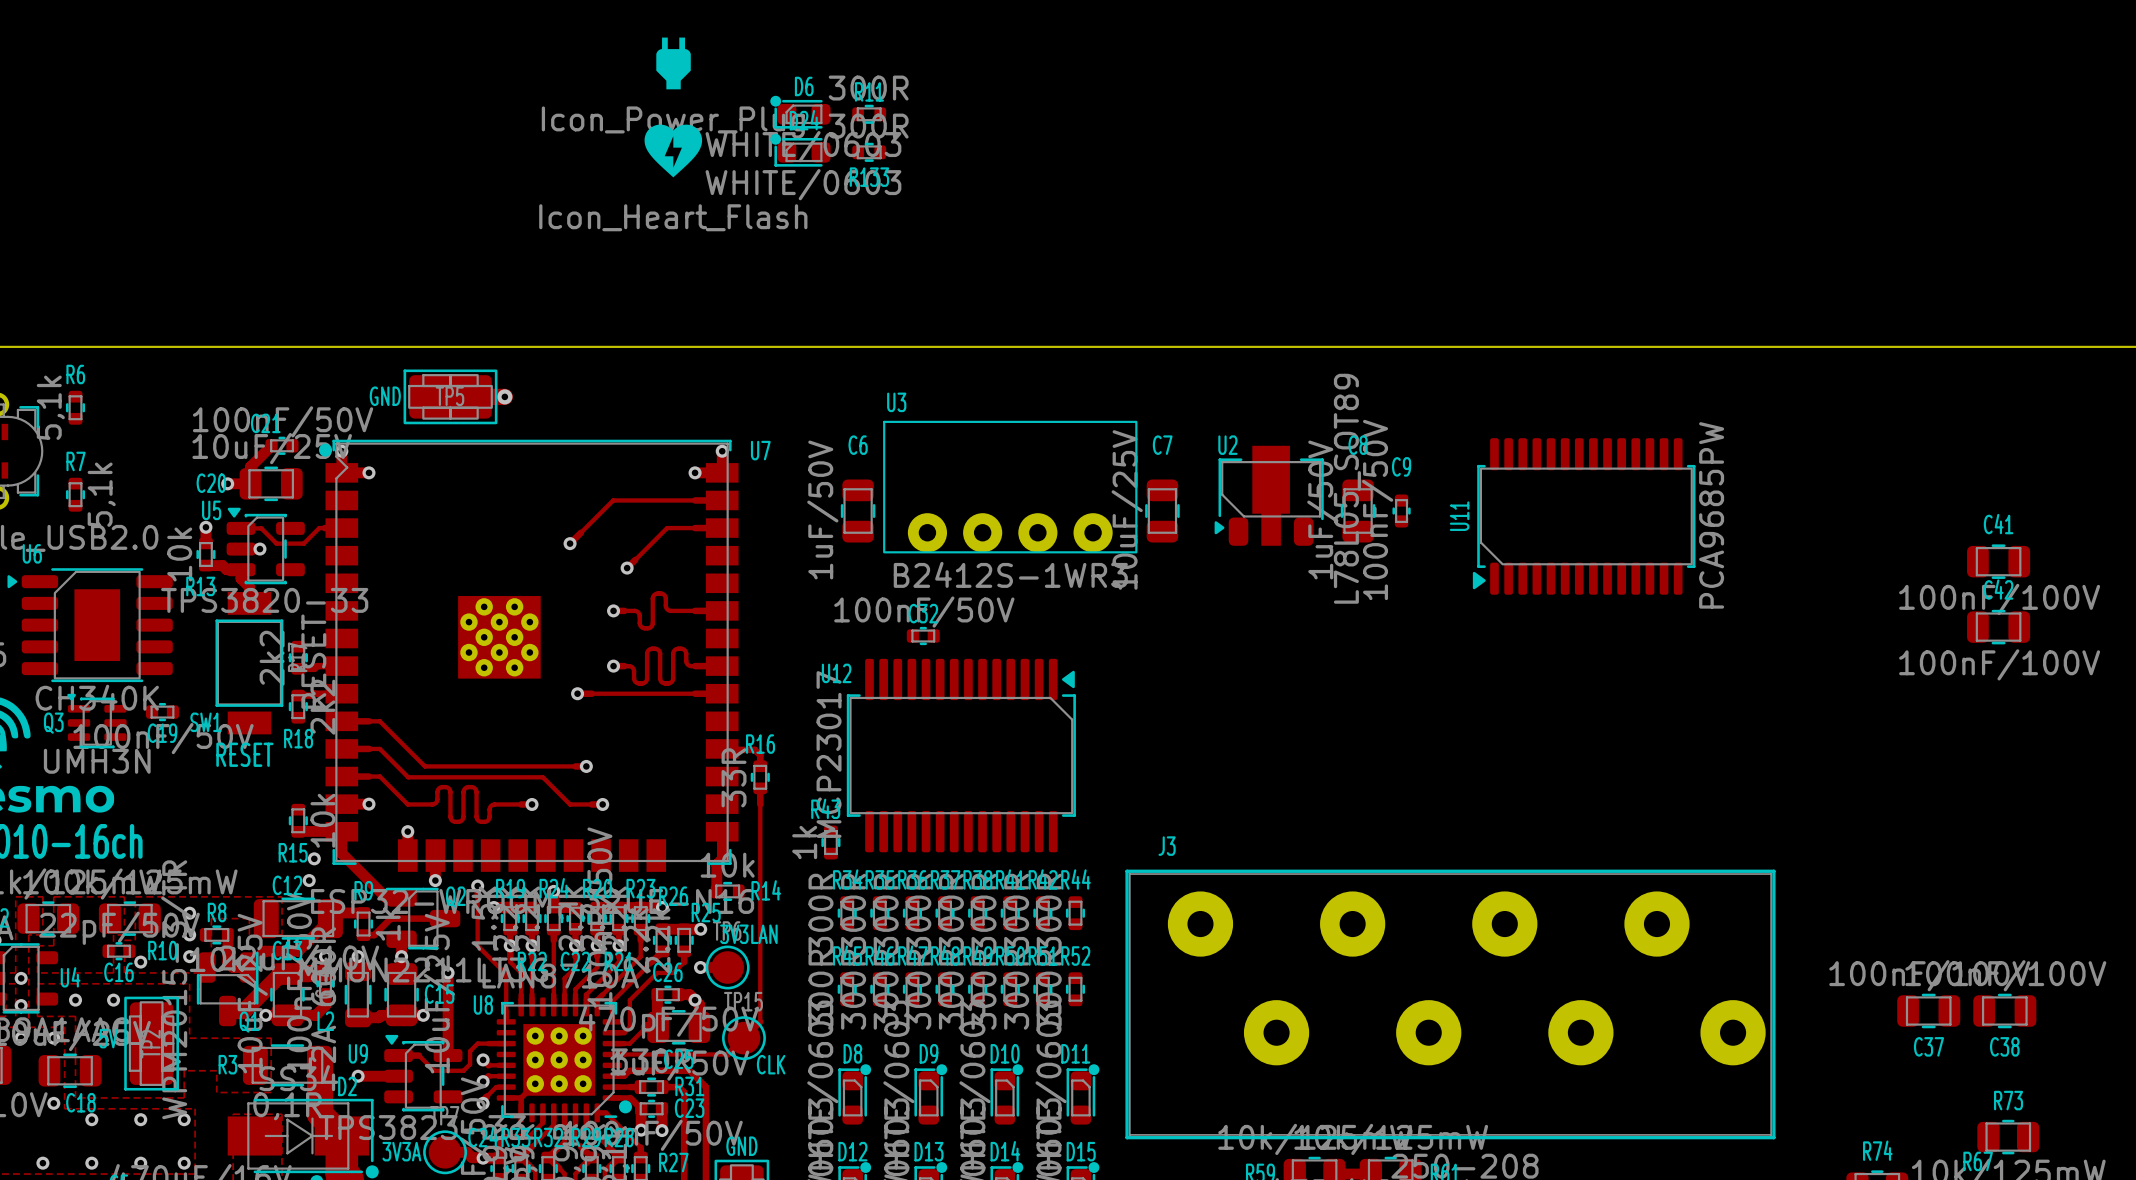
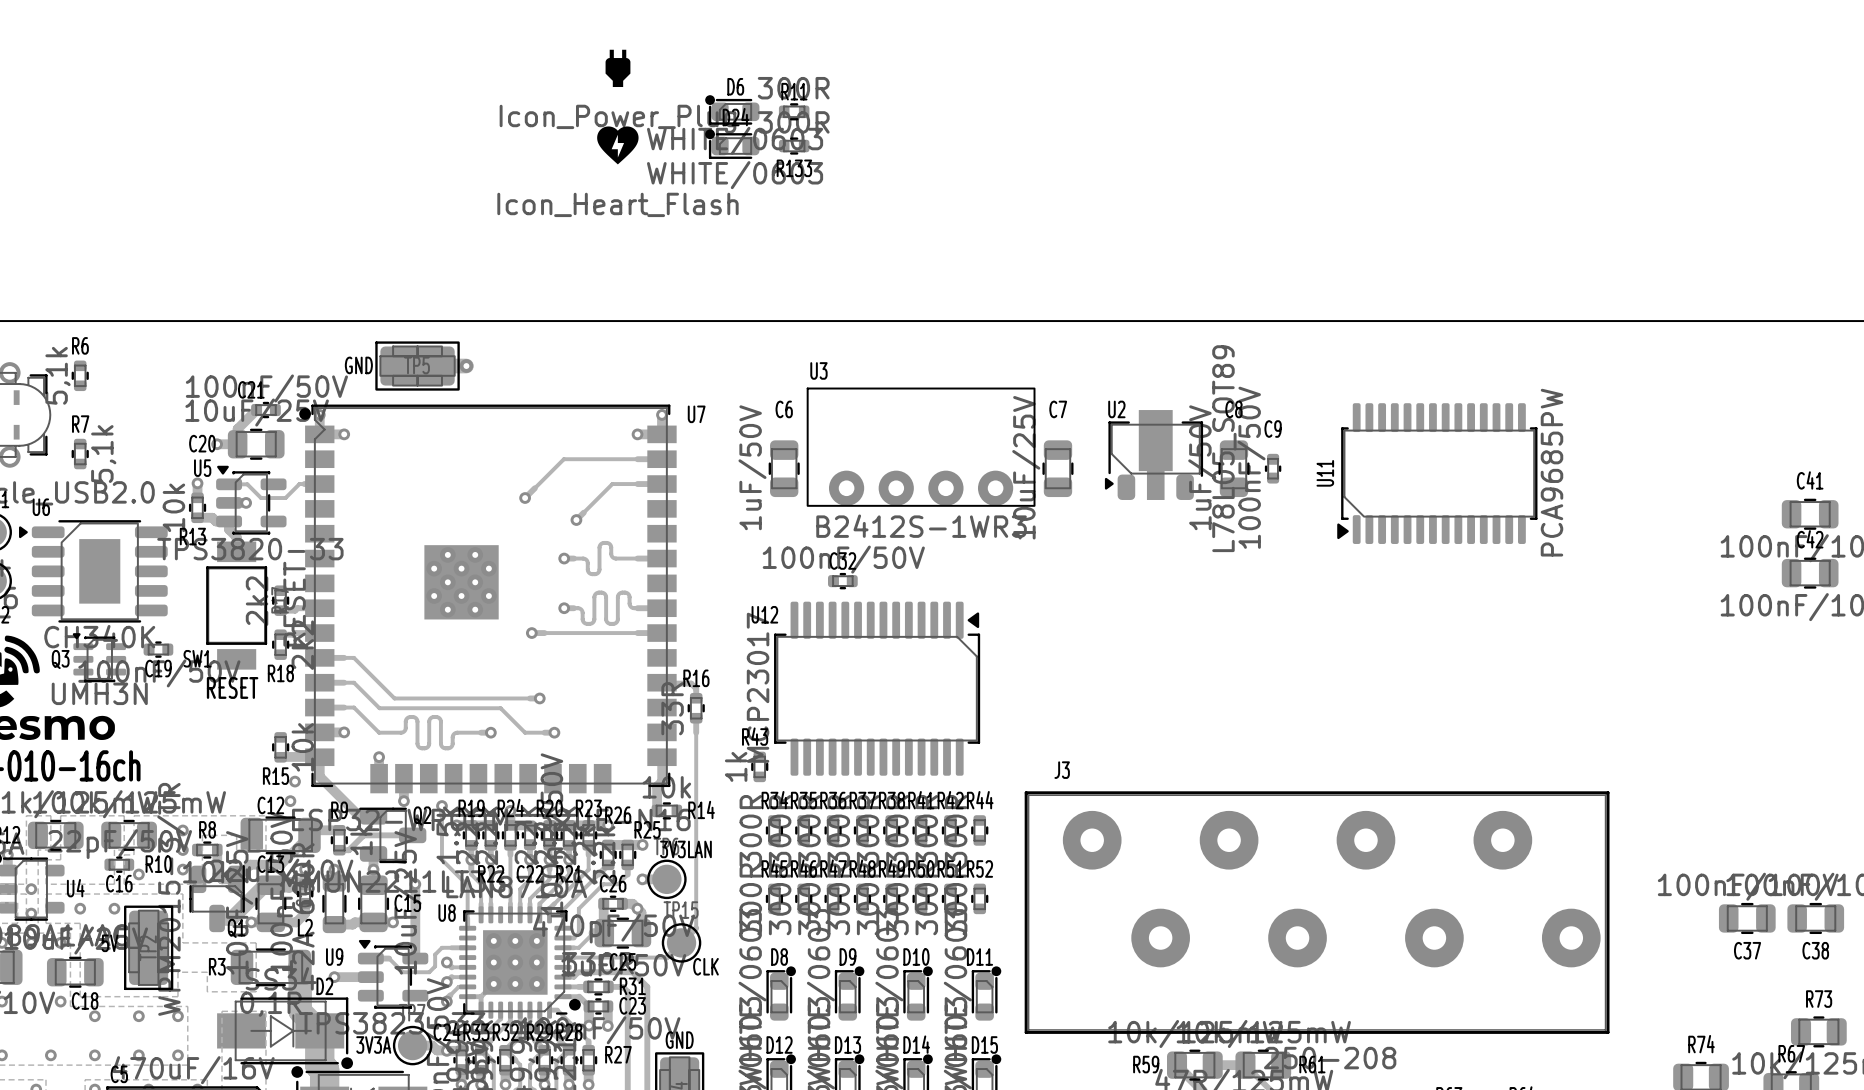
drawing shape: [541, 37, 805, 139] -> [499, 49, 737, 134]
drawing shape: [539, 124, 808, 232] -> [497, 126, 739, 218]

